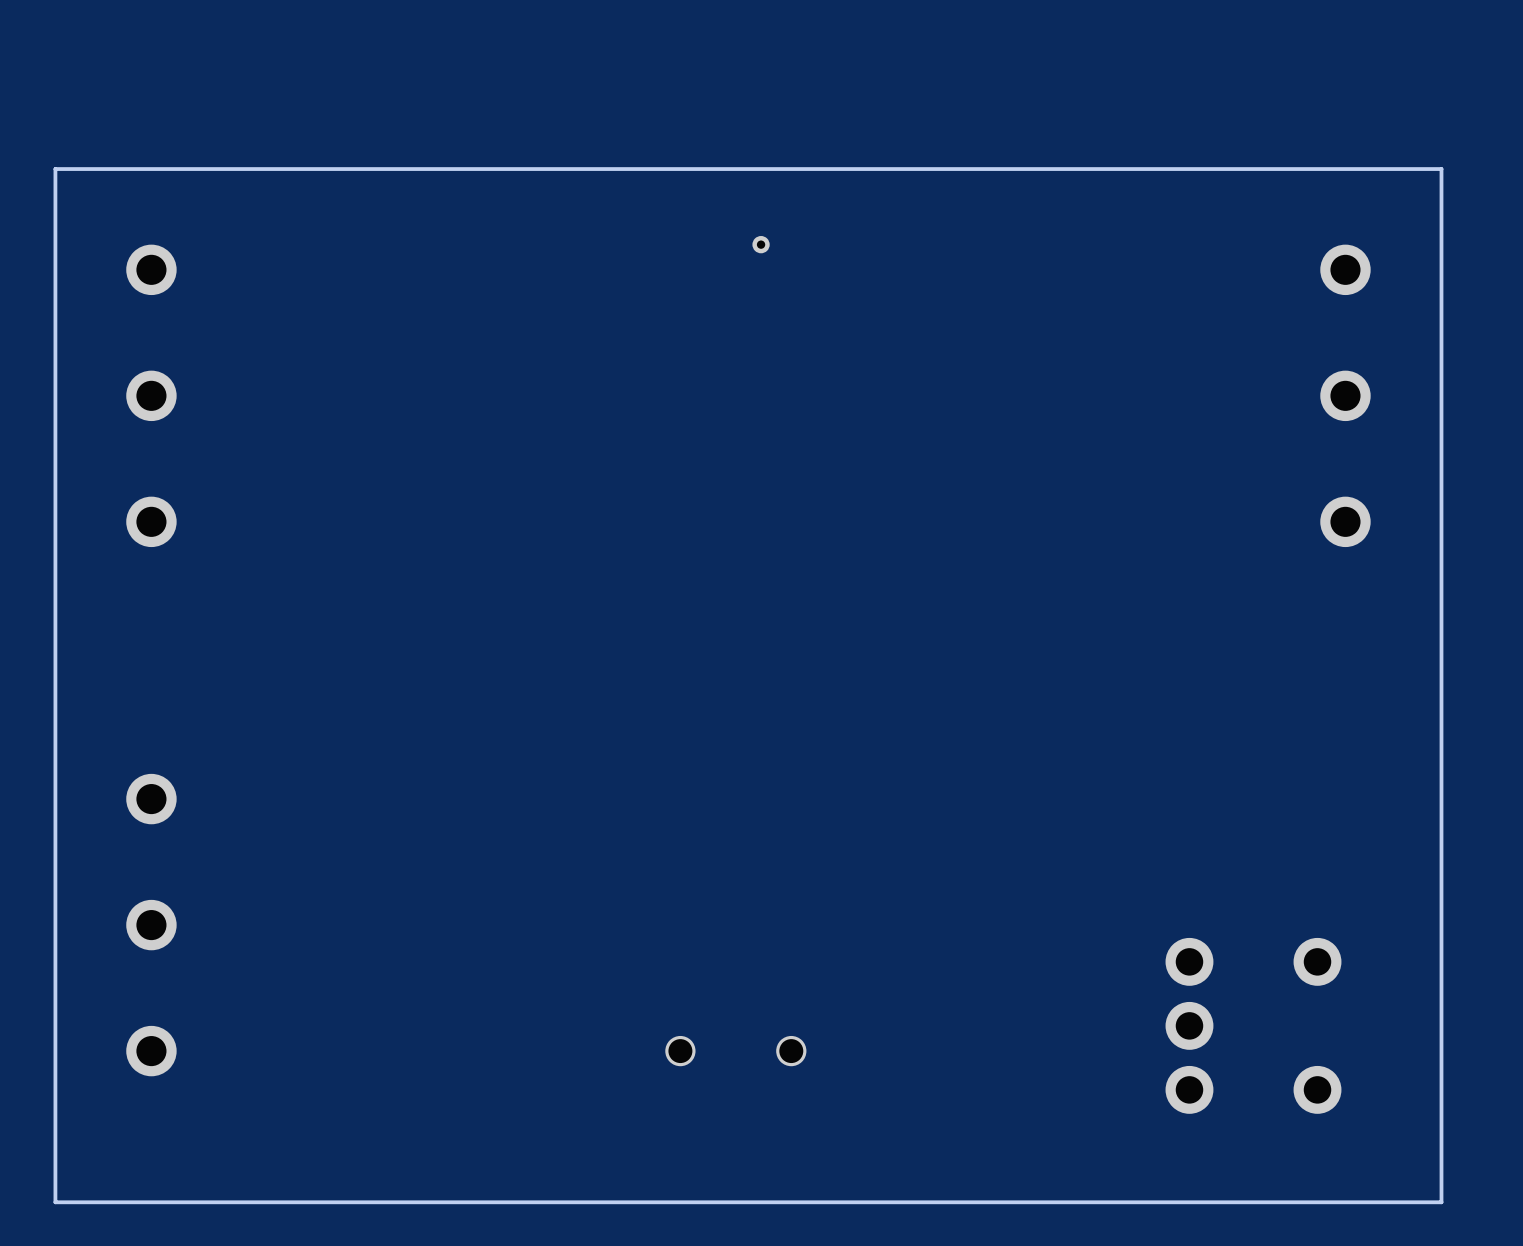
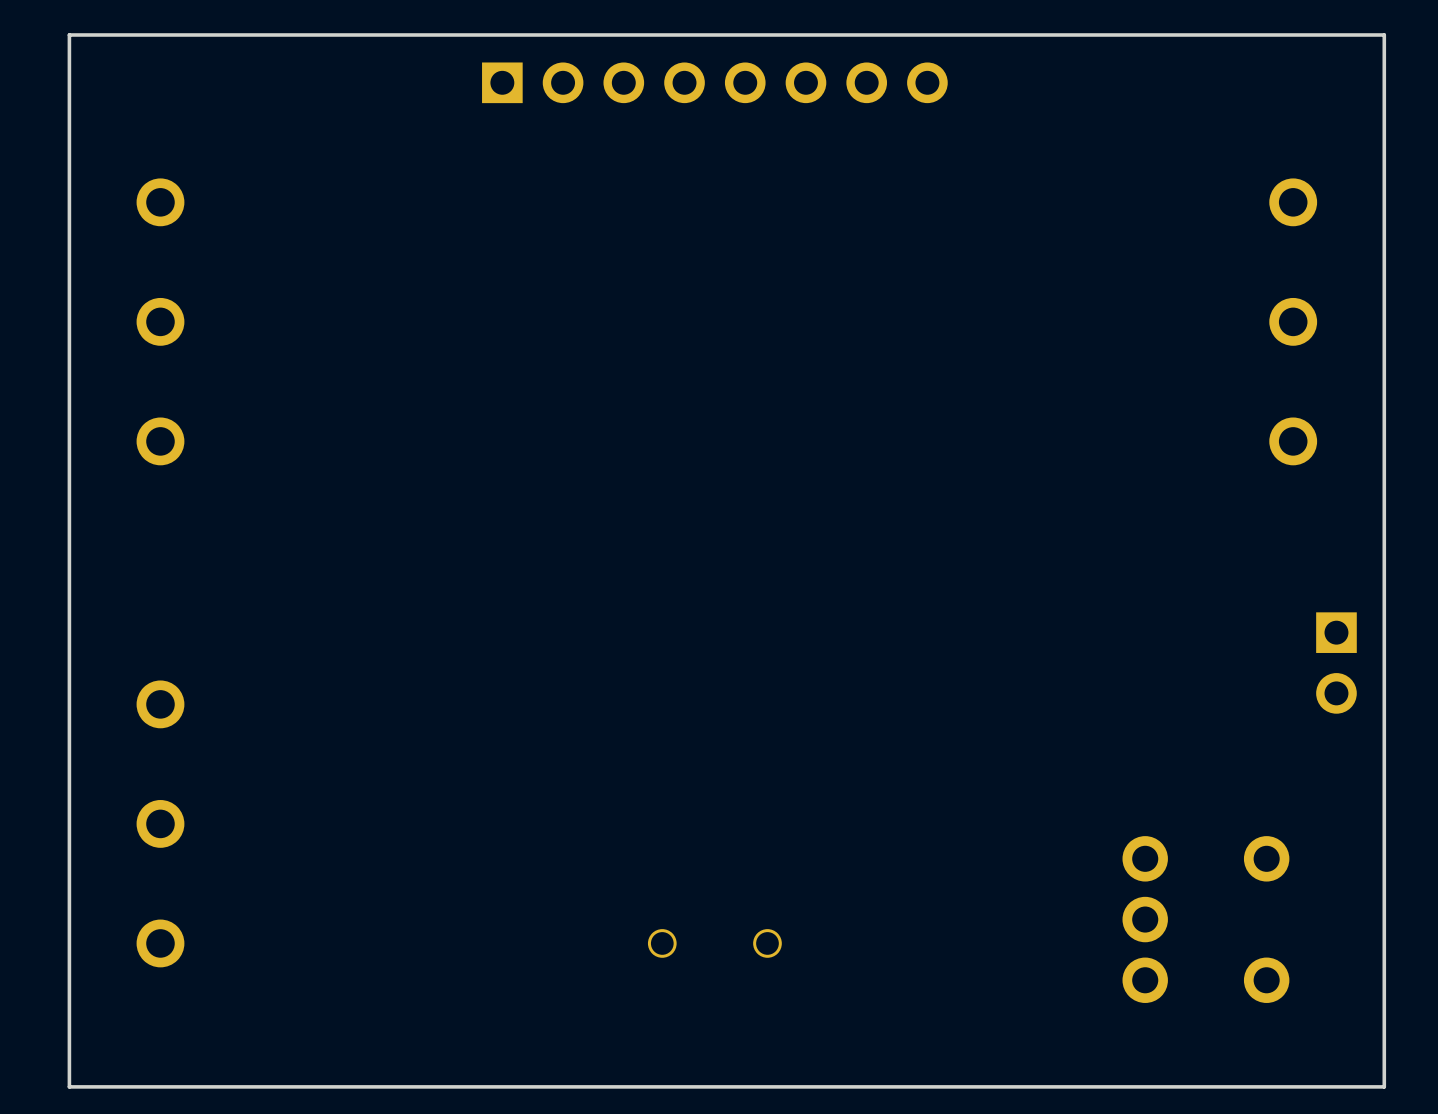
part: none -> (714, 82)
board edge: (1441, 169) (55, 169) -> (1384, 106) (1384, 34) (69, 34) (69, 106)
part: (761, 244) -> none
part: none -> (1336, 663)

